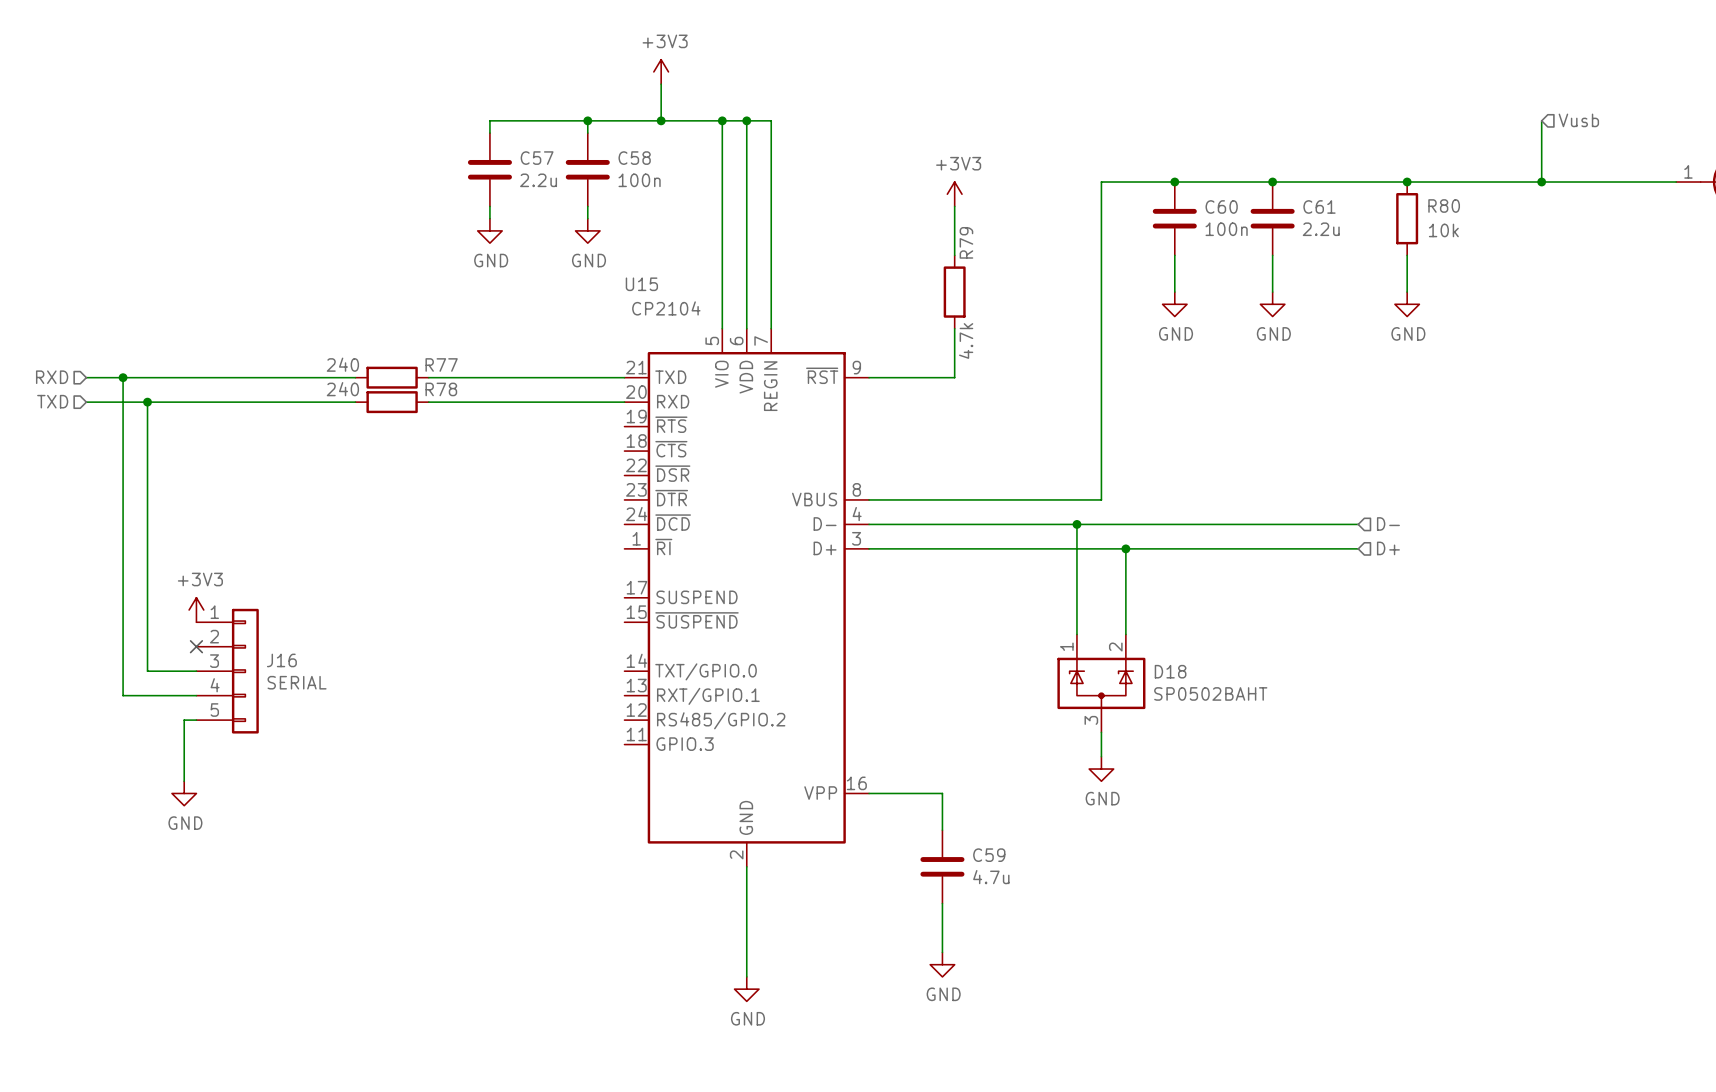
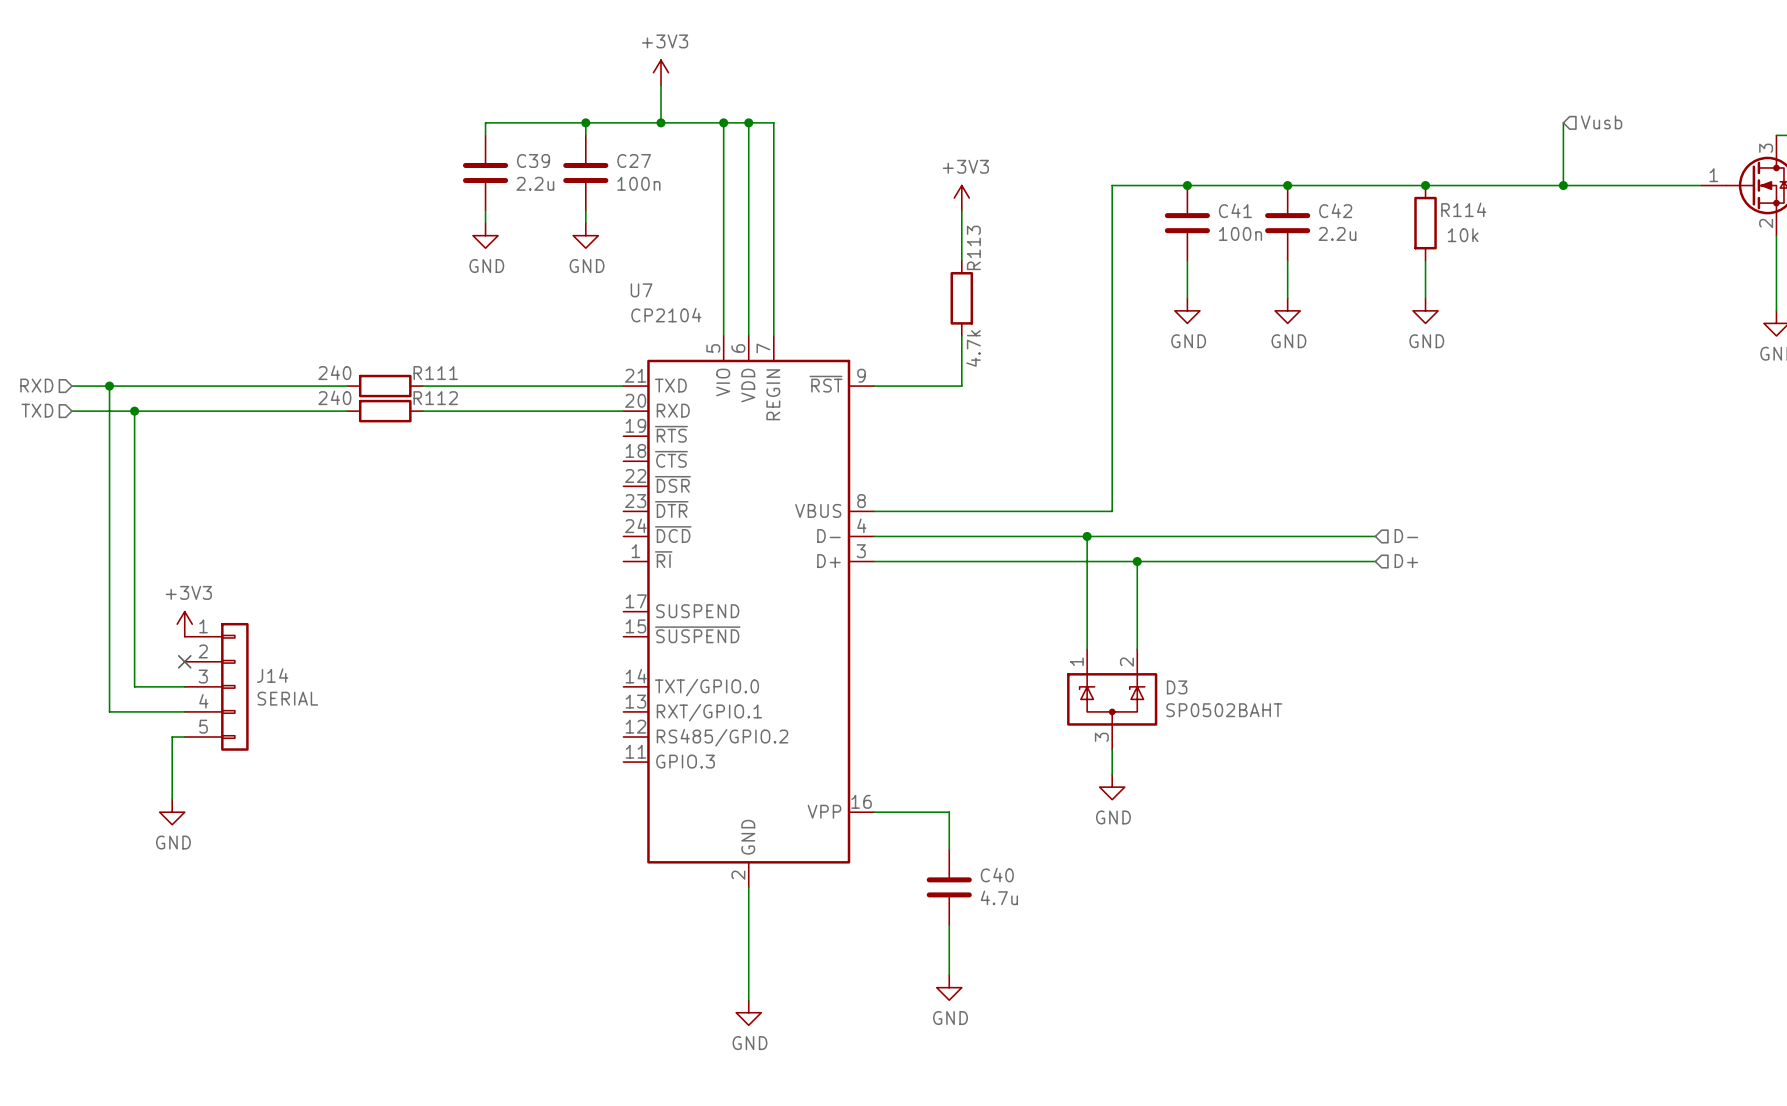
C57 name: C57 (537, 158) -> C39 (533, 161)
C58 name: C58 (634, 158) -> C27 (634, 161)
C60 name: C60 (1221, 206) -> C41 (1235, 210)
C61 name: C61 (1319, 206) -> C42 (1335, 210)
R80 name: R80 (1444, 206) -> R114 (1463, 209)
R79 name: R79 (966, 242) -> R113 (973, 247)
U15 name: U15 (641, 284) -> U7 (641, 290)
R77 name: R77 (441, 364) -> R111 (435, 373)
R78 name: R78 (441, 389) -> R112 (435, 398)
J16 name: J16 (281, 660) -> J14 (272, 675)
D18 name: D18 (1170, 671) -> D3 (1177, 687)
C59 name: C59 (989, 855) -> C40 (997, 875)

